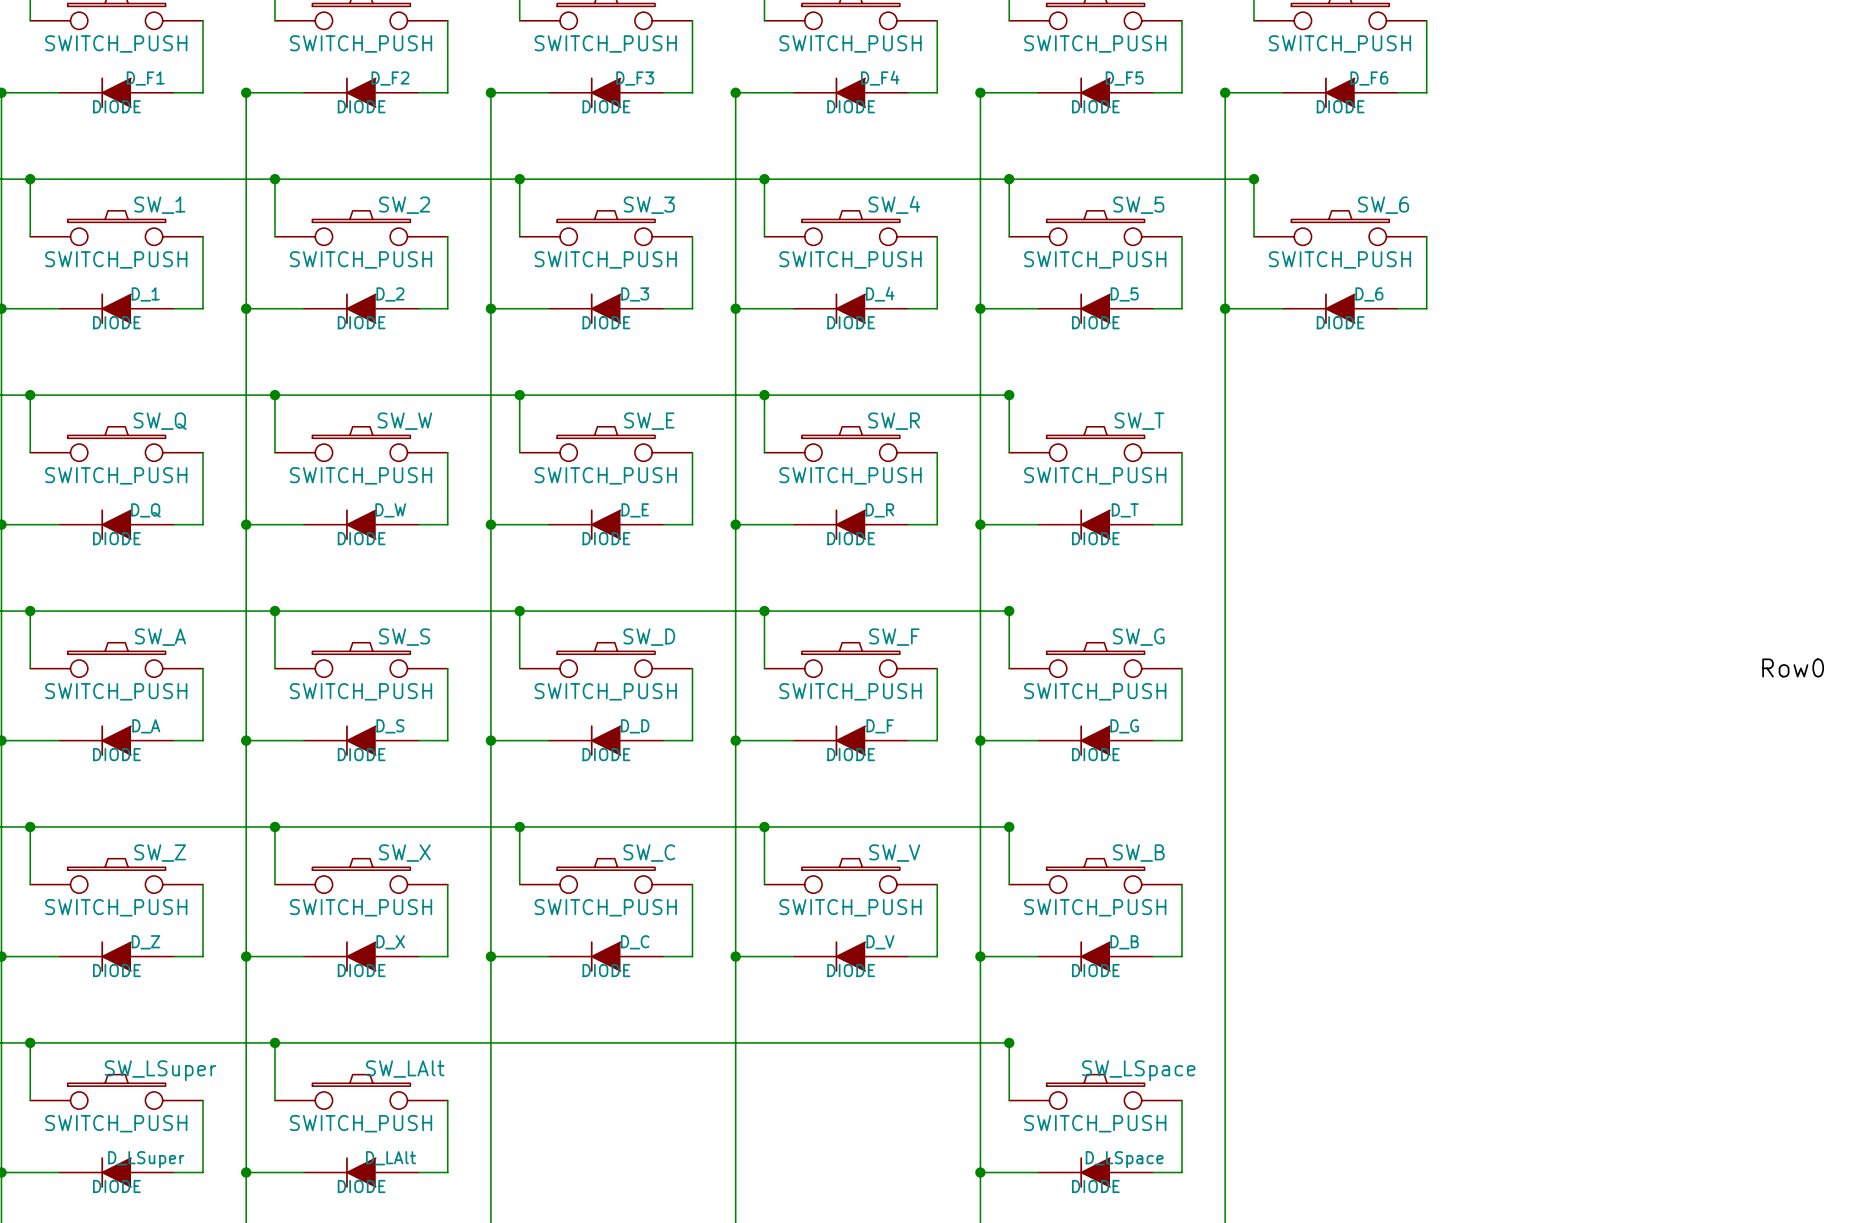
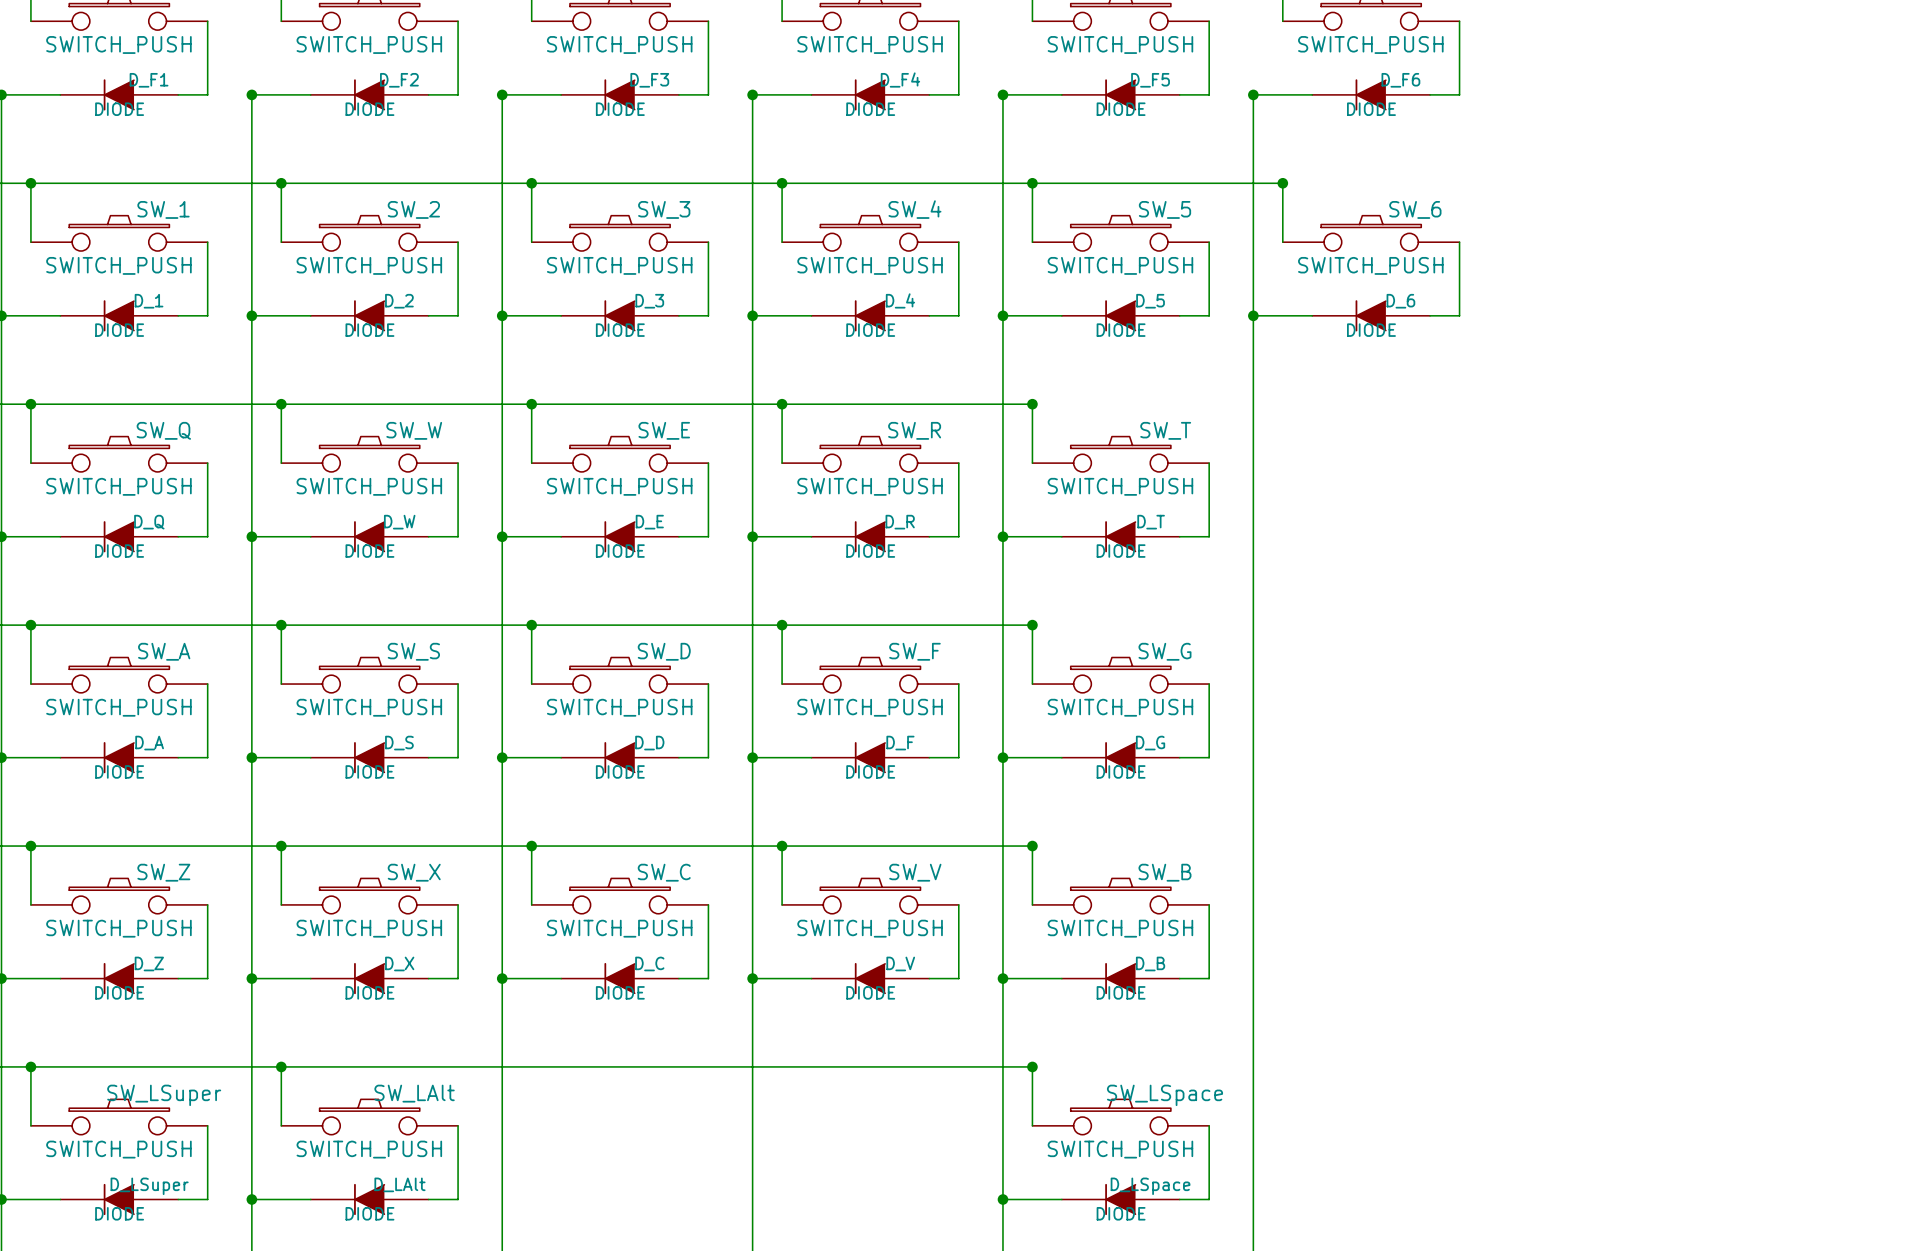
label: Row0 (1793, 667) -> none

